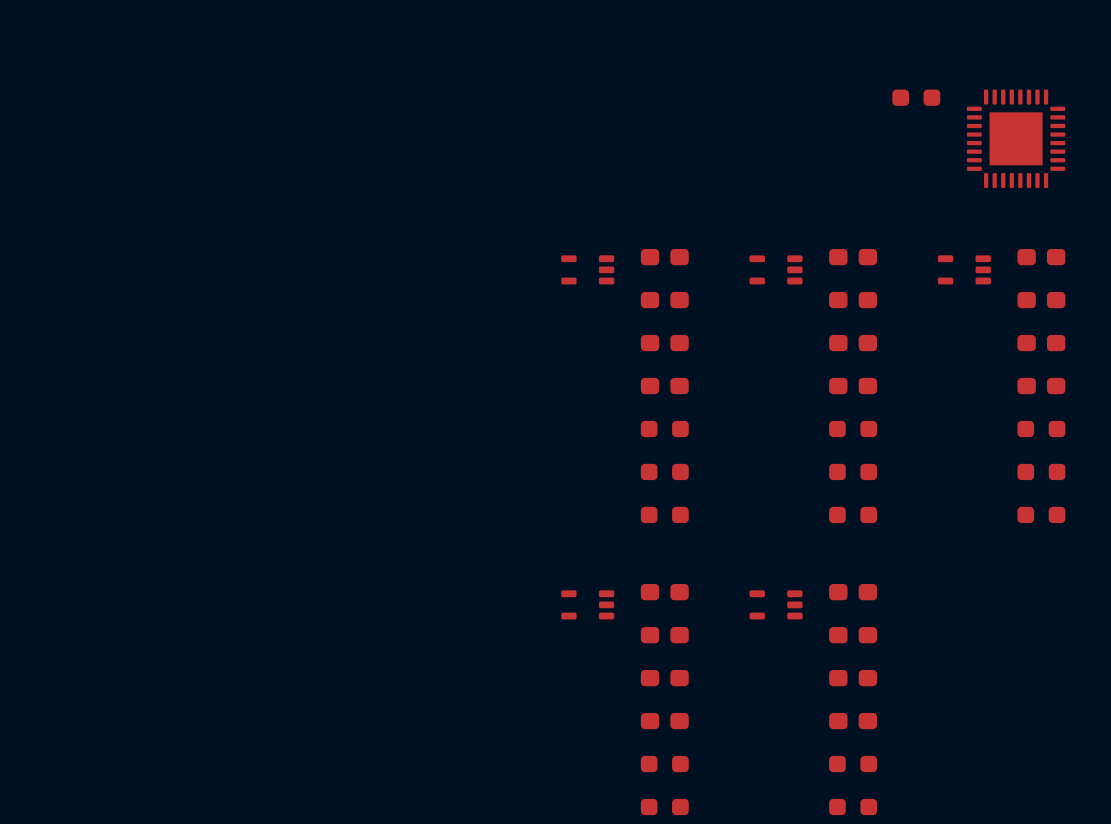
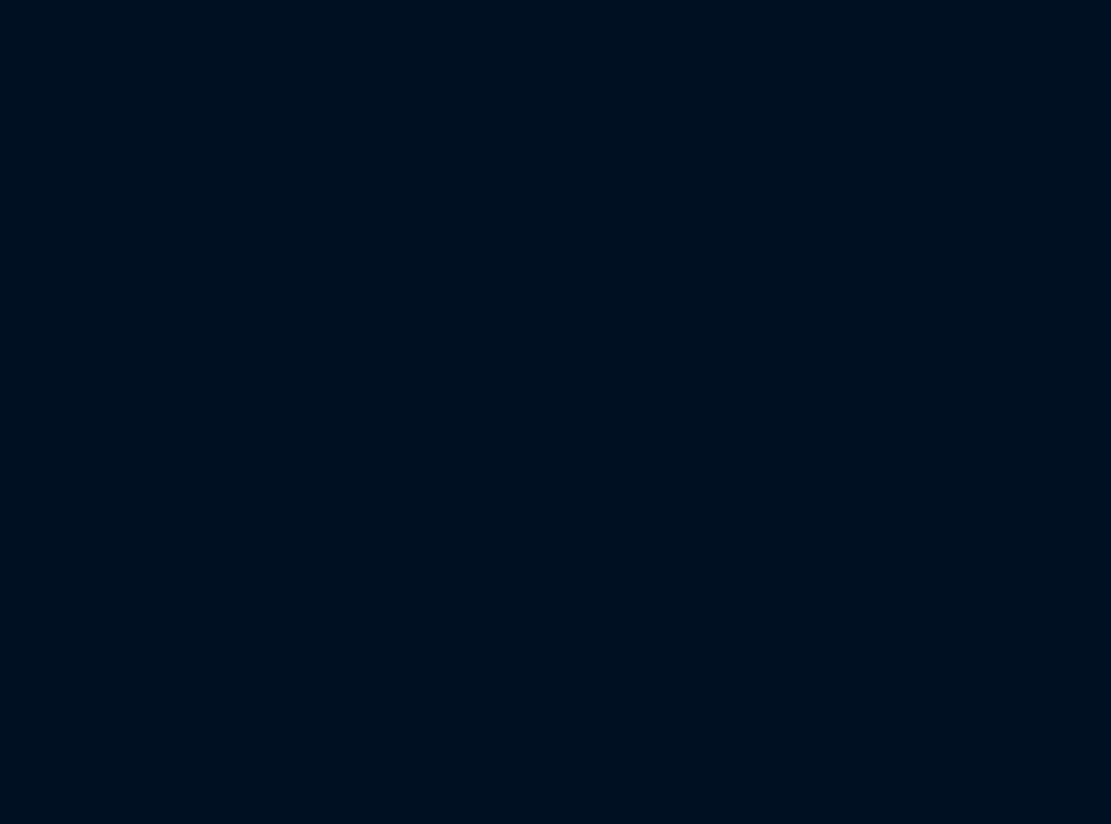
part: (916, 97) -> none
part: (1016, 138) -> none
part: (664, 257) -> none
part: (853, 257) -> none
part: (1041, 257) -> none
part: (587, 269) -> none
part: (776, 269) -> none
part: (964, 269) -> none
part: (664, 300) -> none
part: (853, 300) -> none
part: (1041, 300) -> none
part: (664, 343) -> none
part: (853, 343) -> none
part: (1041, 343) -> none
part: (664, 386) -> none
part: (853, 386) -> none
part: (1041, 386) -> none
part: (664, 428) -> none
part: (853, 428) -> none
part: (1041, 428) -> none
part: (664, 471) -> none
part: (853, 471) -> none
part: (1041, 471) -> none
part: (664, 514) -> none
part: (853, 514) -> none
part: (1041, 514) -> none
part: (664, 592) -> none
part: (853, 592) -> none
part: (587, 604) -> none
part: (776, 604) -> none
part: (664, 635) -> none
part: (853, 635) -> none
part: (664, 678) -> none
part: (853, 678) -> none
part: (664, 721) -> none
part: (853, 721) -> none
part: (664, 764) -> none
part: (853, 764) -> none
part: (664, 807) -> none
part: (853, 807) -> none

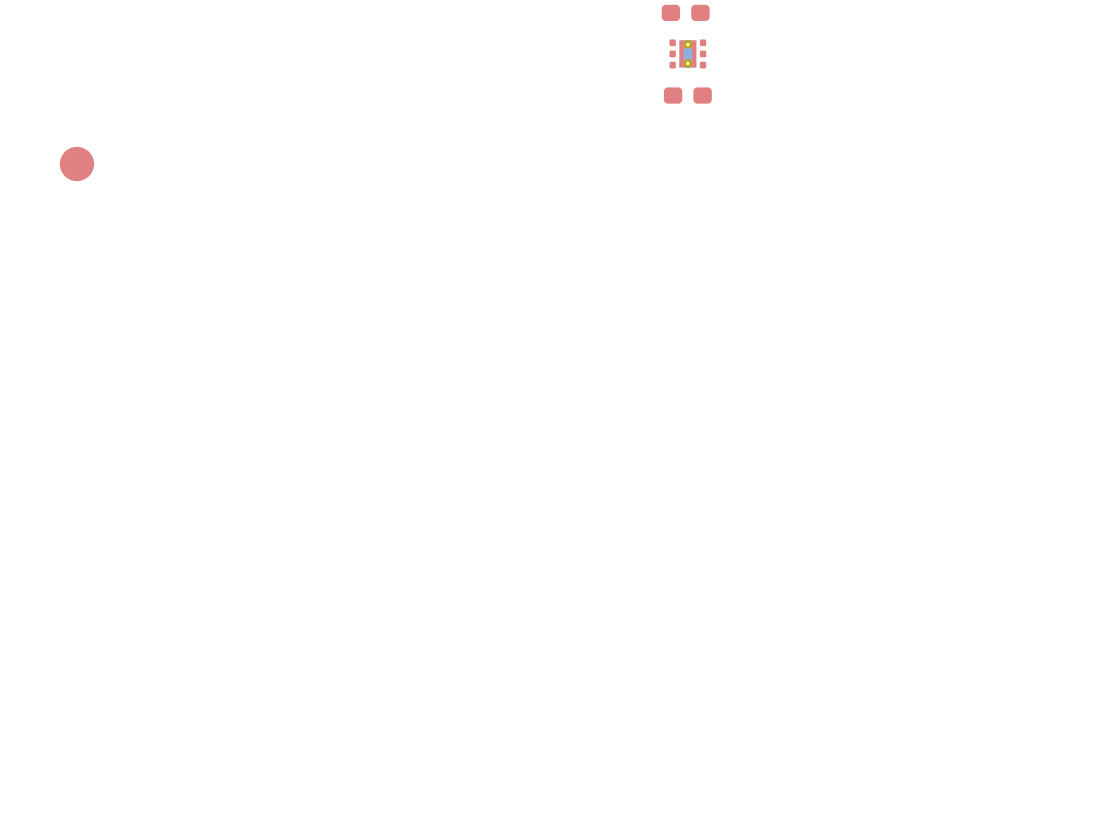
part: none -> (685, 12)
part: none -> (687, 53)
part: none -> (687, 95)
part: none -> (76, 164)

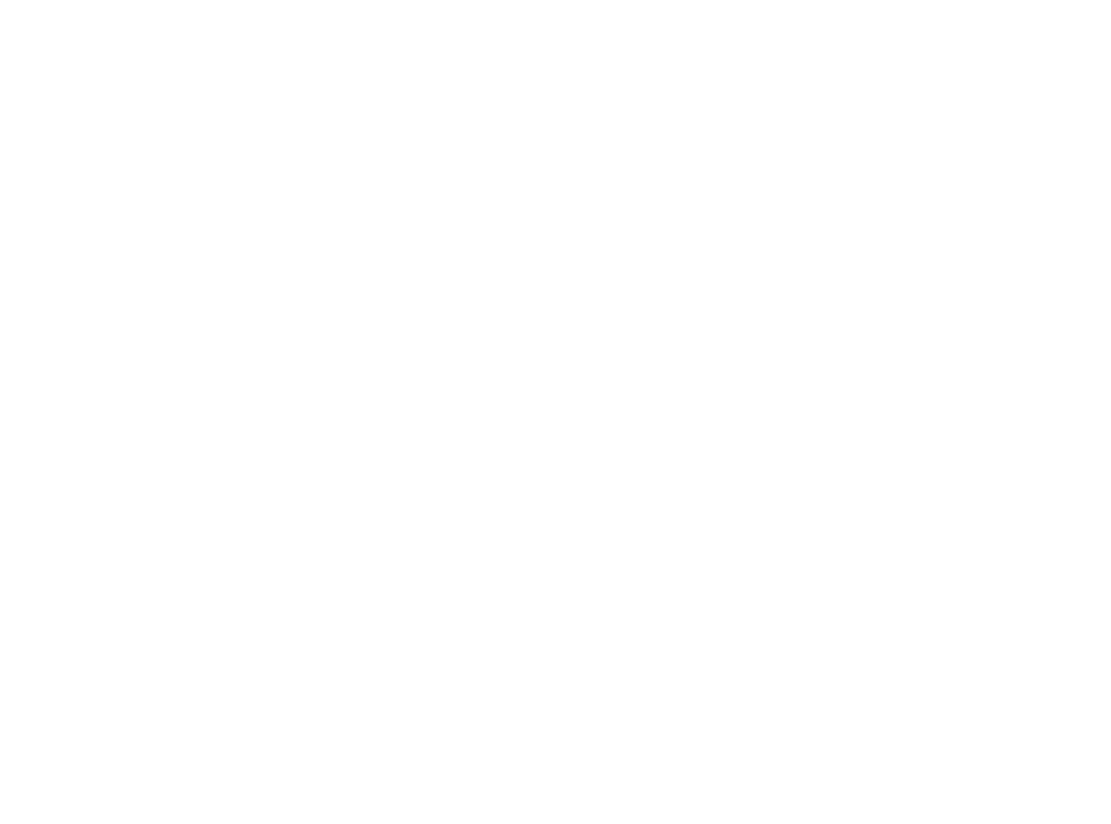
part: (685, 12) -> none
part: (687, 53) -> none
part: (687, 95) -> none
part: (76, 164) -> none

